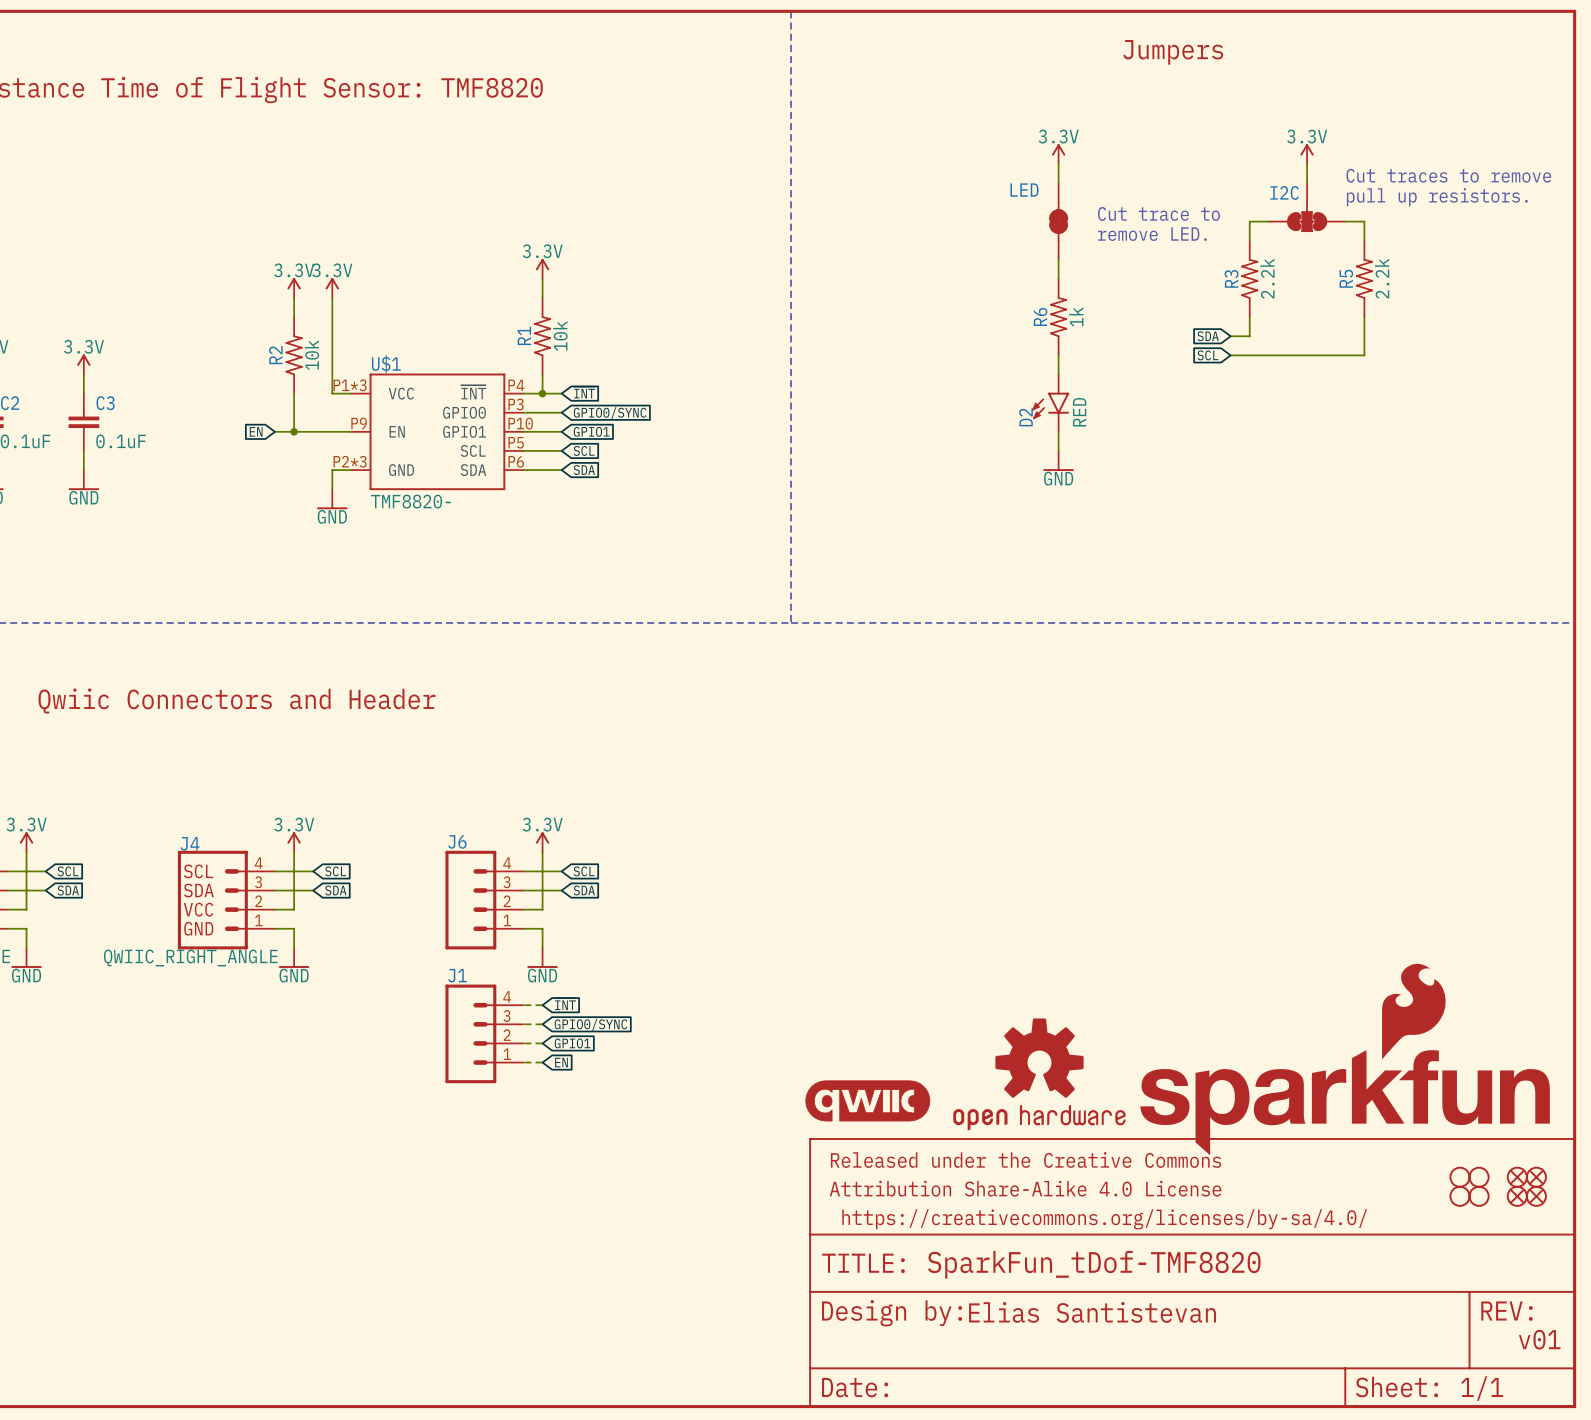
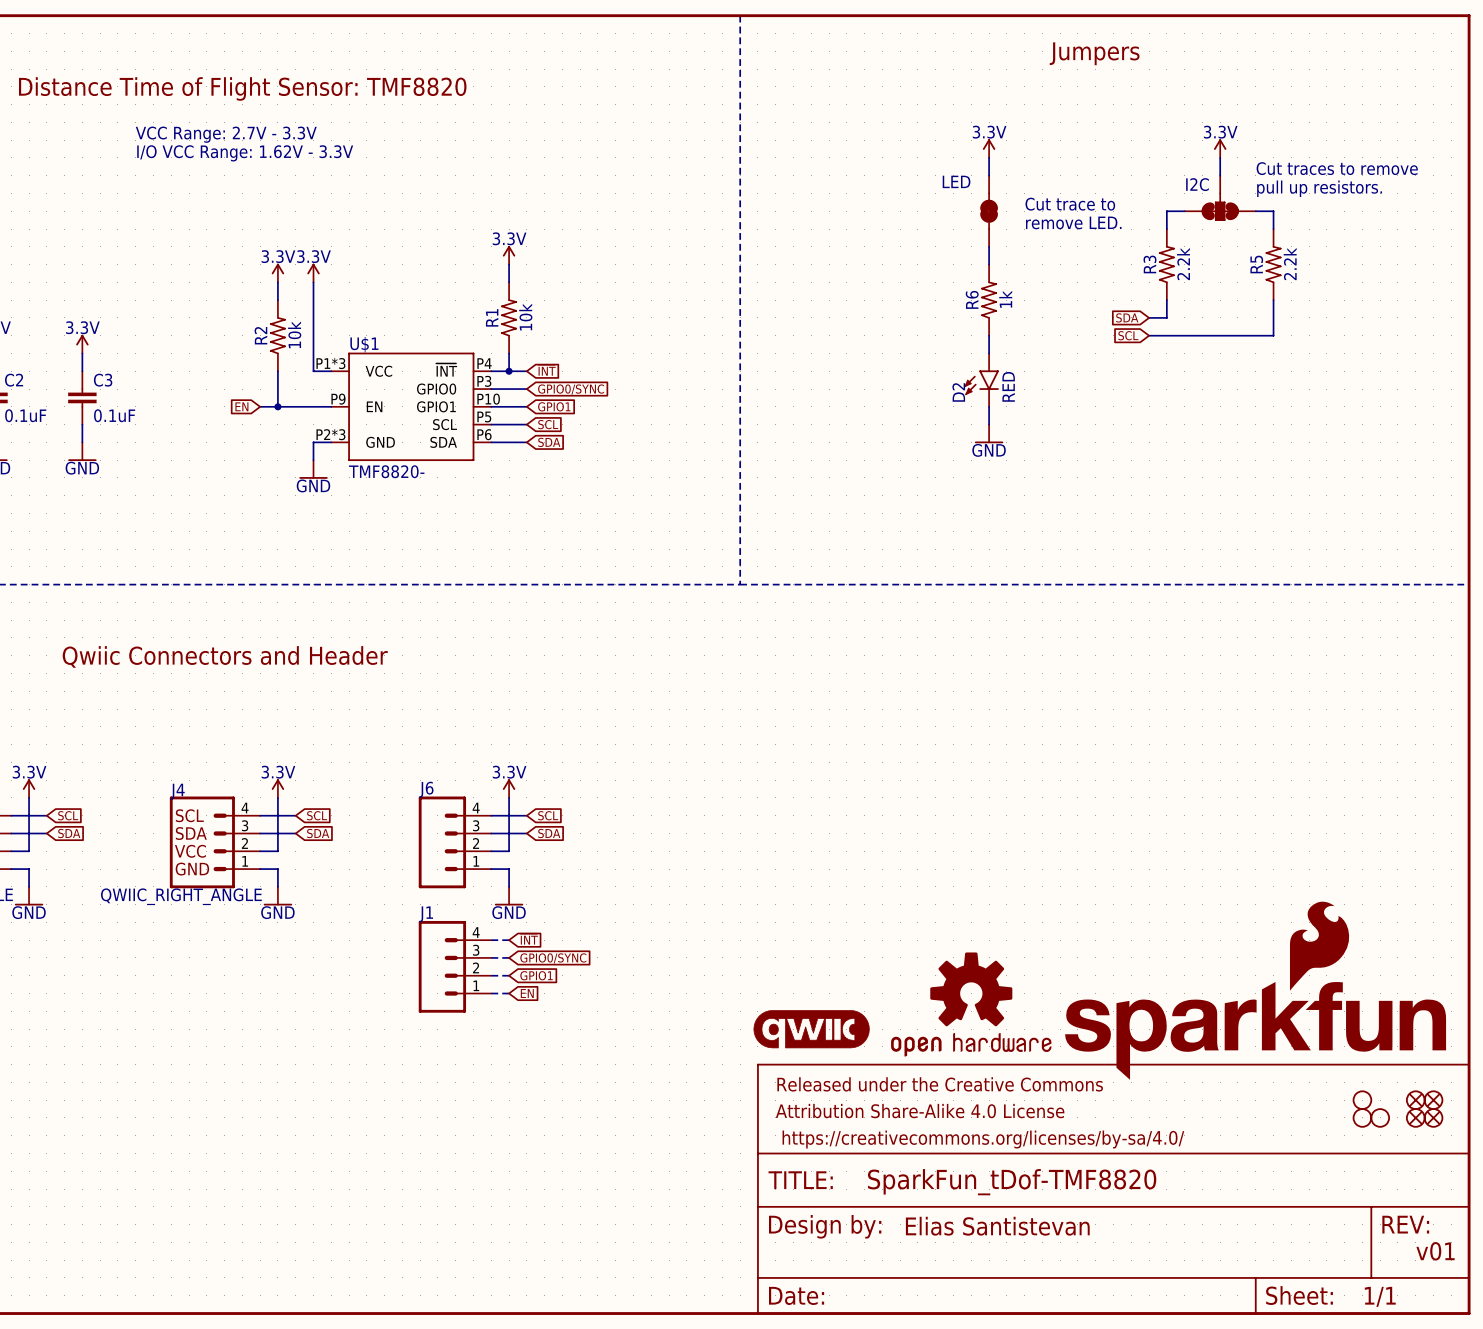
text: none -> VCC Range: 2.7V - 3.3V (226, 134)
text: none -> I/O VCC Range: 1.62V - 3.3V (245, 153)
part: (1479, 1177) -> none

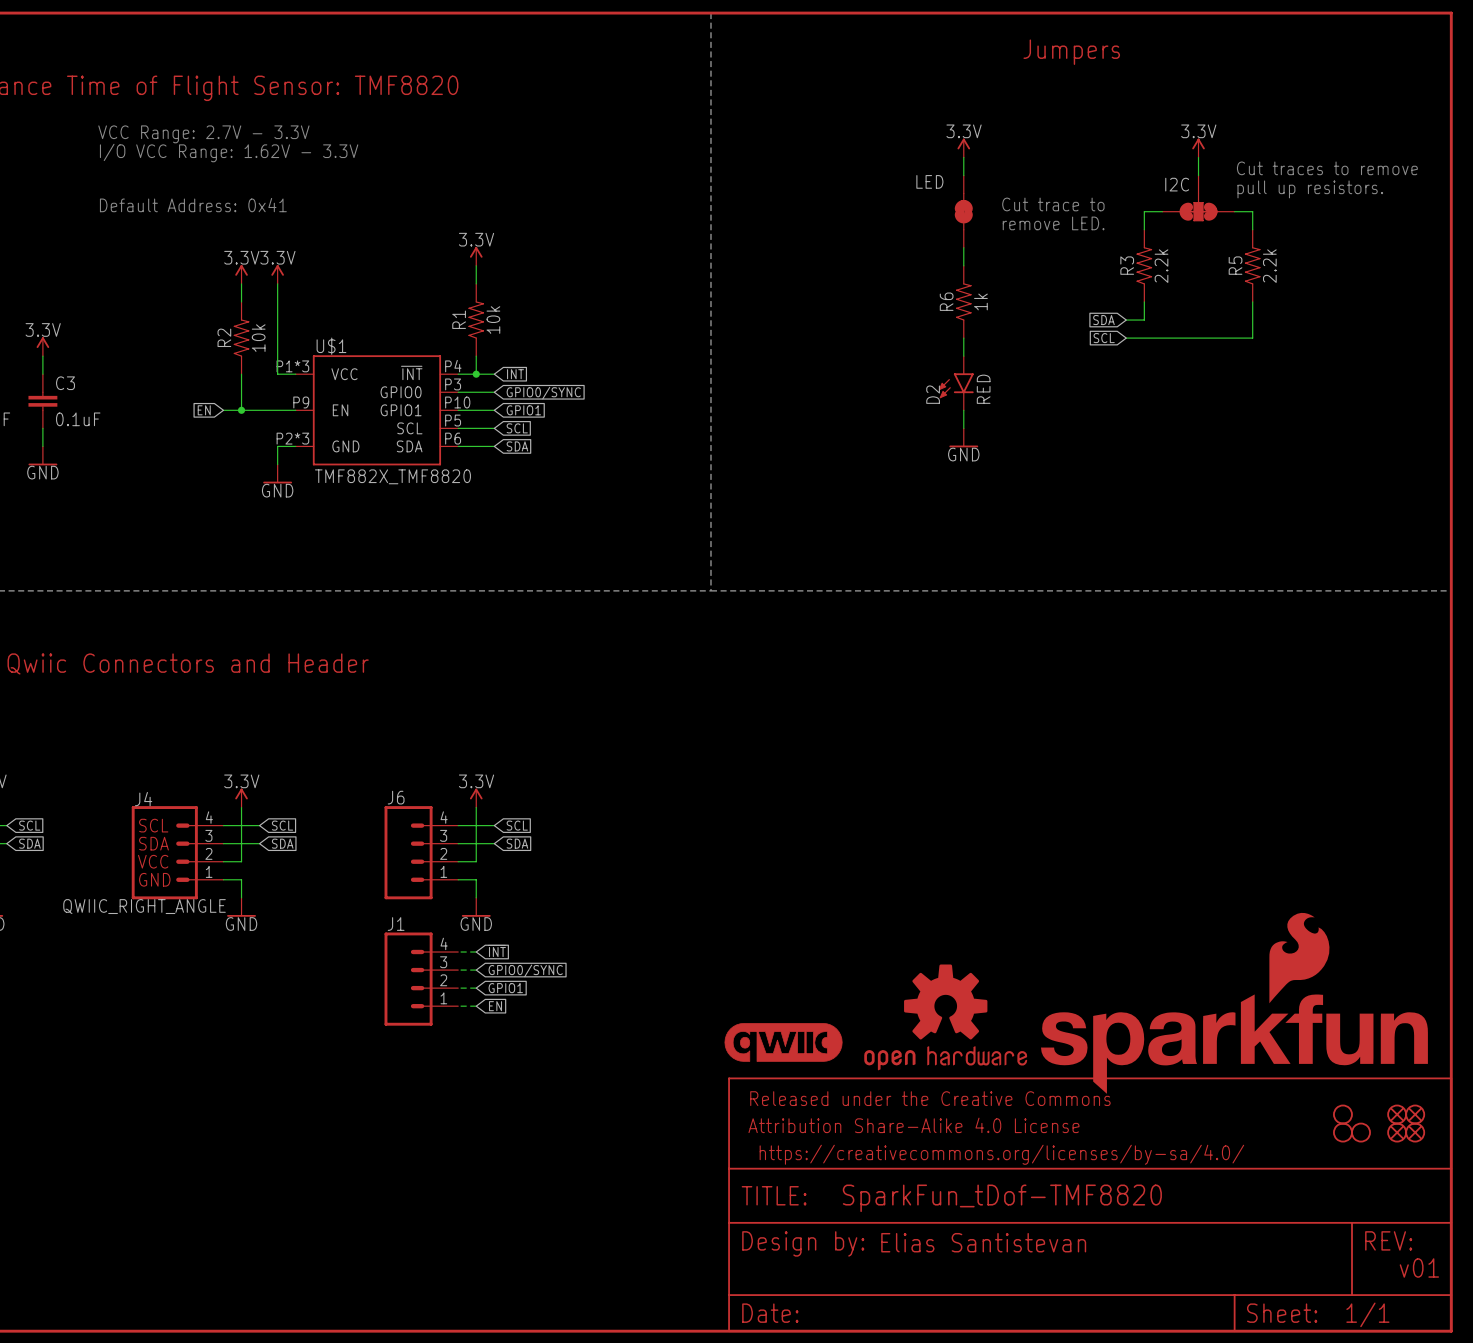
text: none -> Default Address: 0x41 (193, 205)
U$1 value: TMF8820- (386, 471) -> TMF882X_TMF8820 (392, 476)

